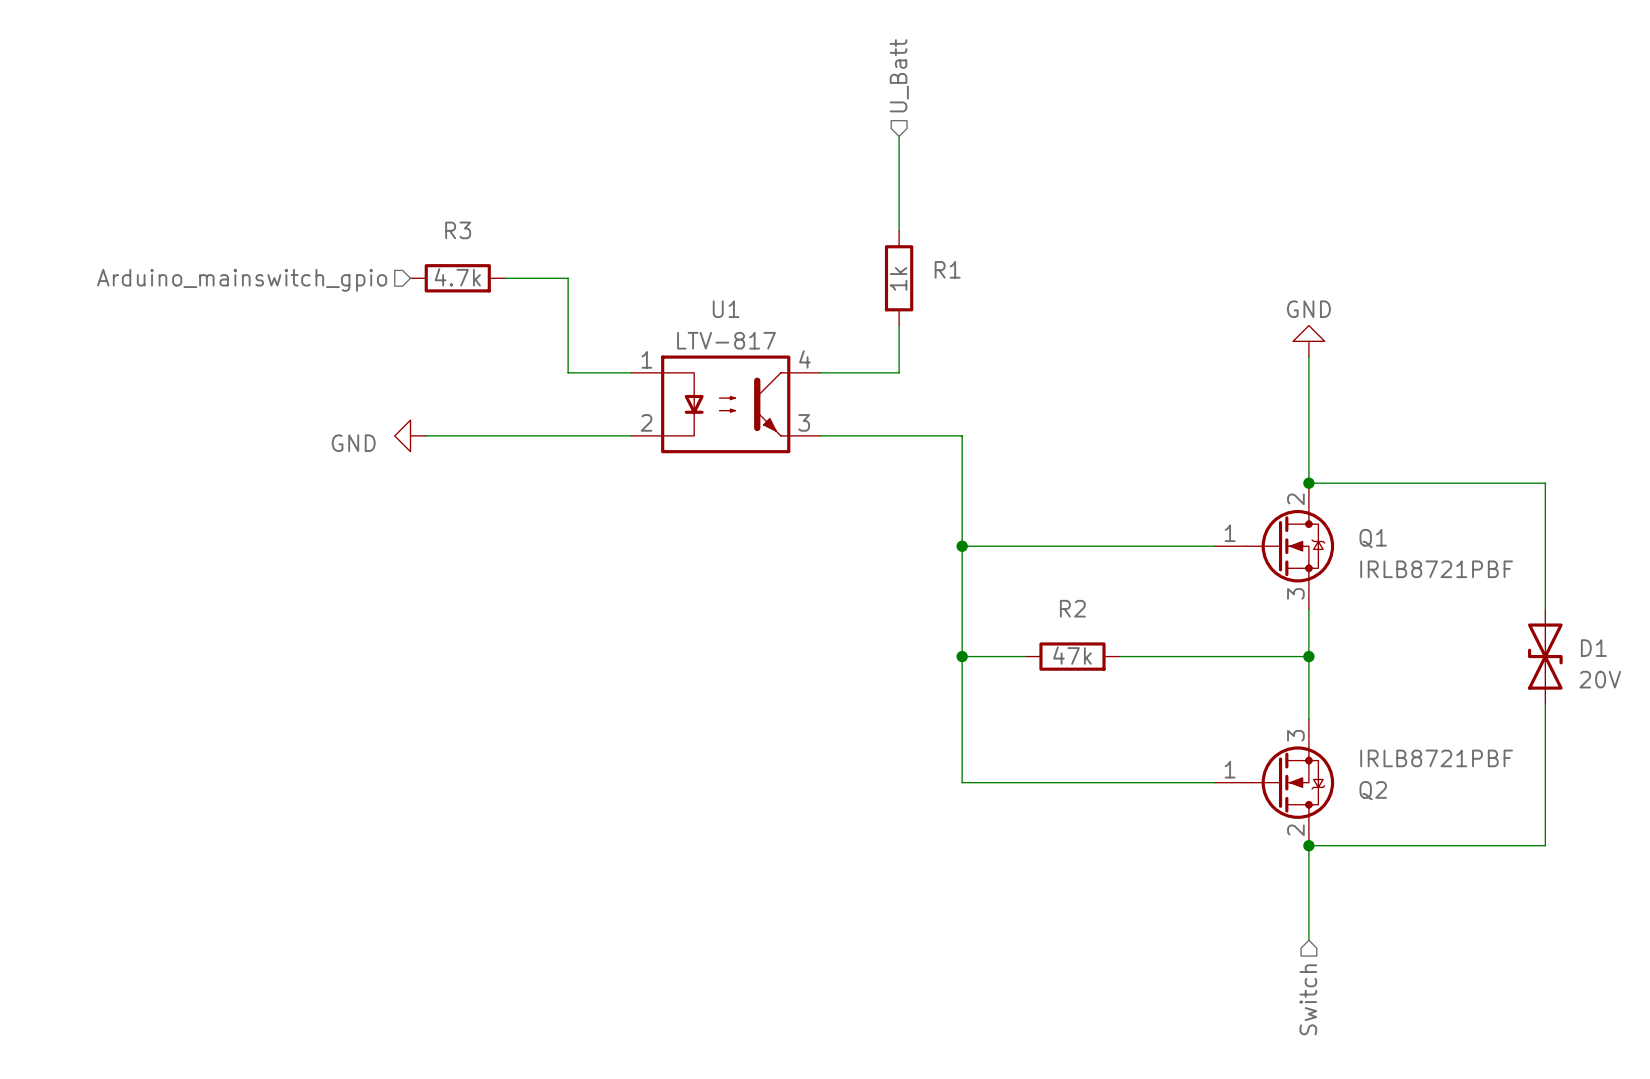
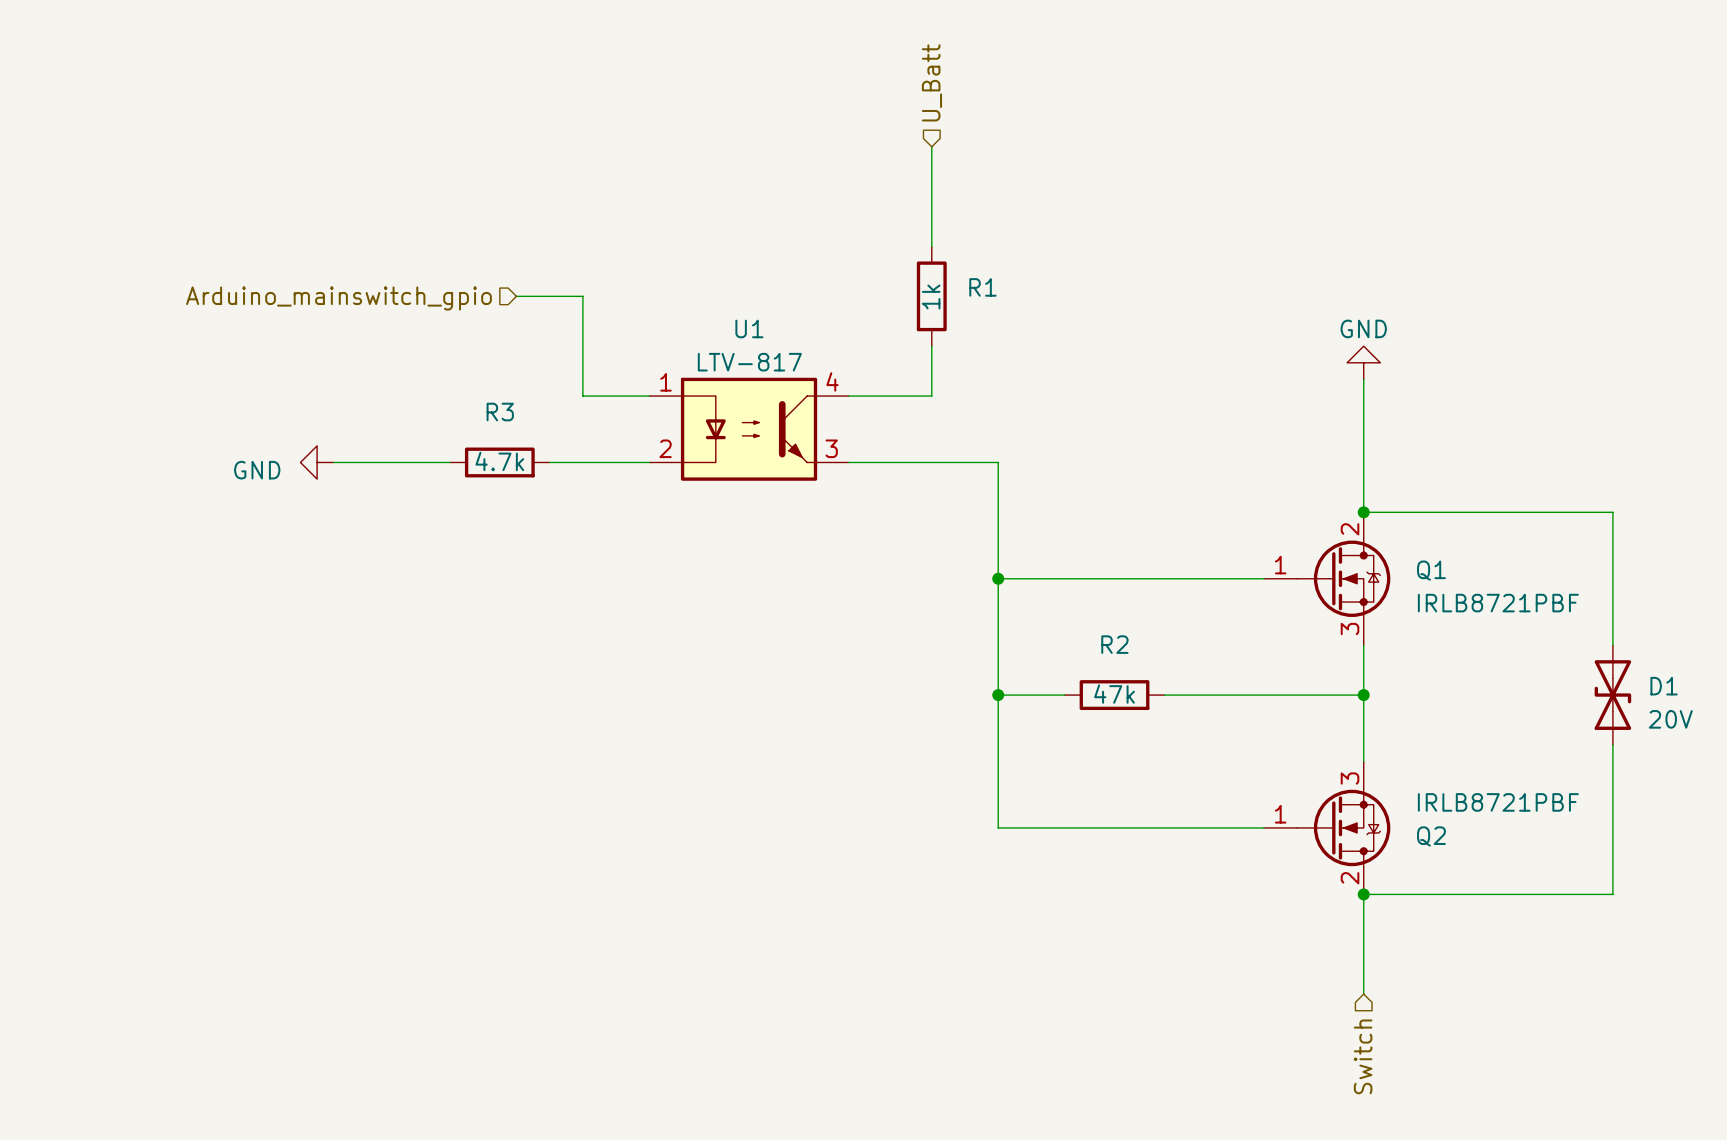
R3 position: (457, 278) -> (499, 462)
hierarchical label position: Arduino_mainswitch_gpio (242, 280) -> Arduino_mainswitch_gpio (338, 298)
power symbol position: GND (410, 435) -> GND (317, 462)
wire: (442, 435) (536, 435) -> (333, 462) (433, 462)

